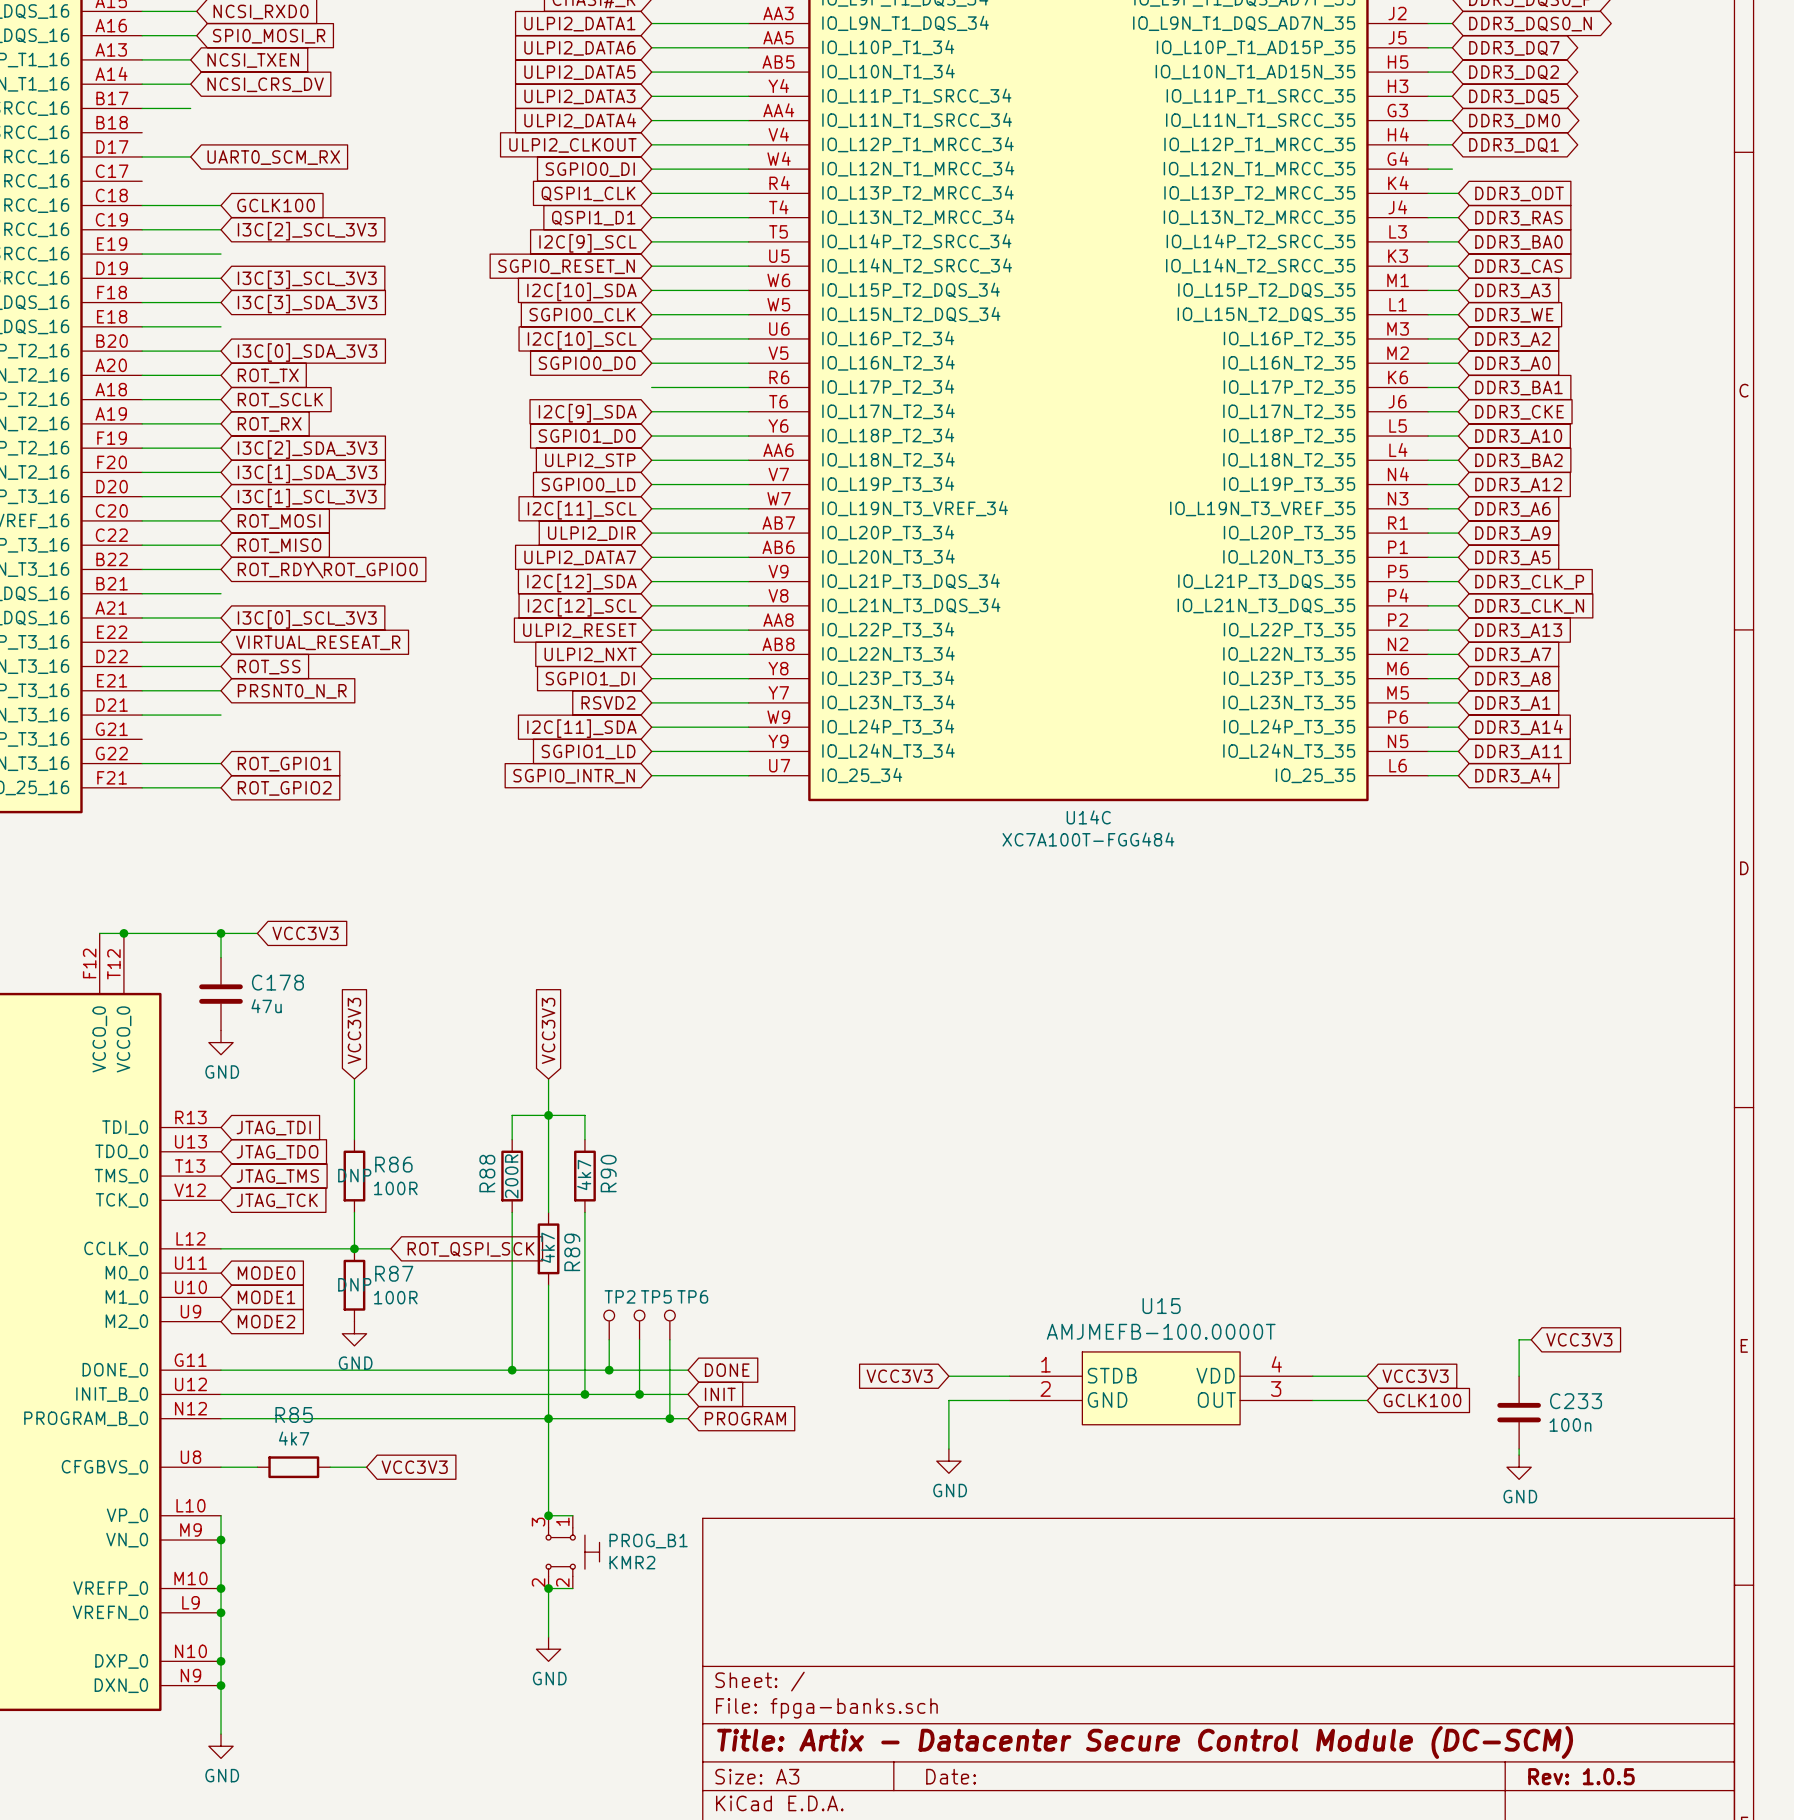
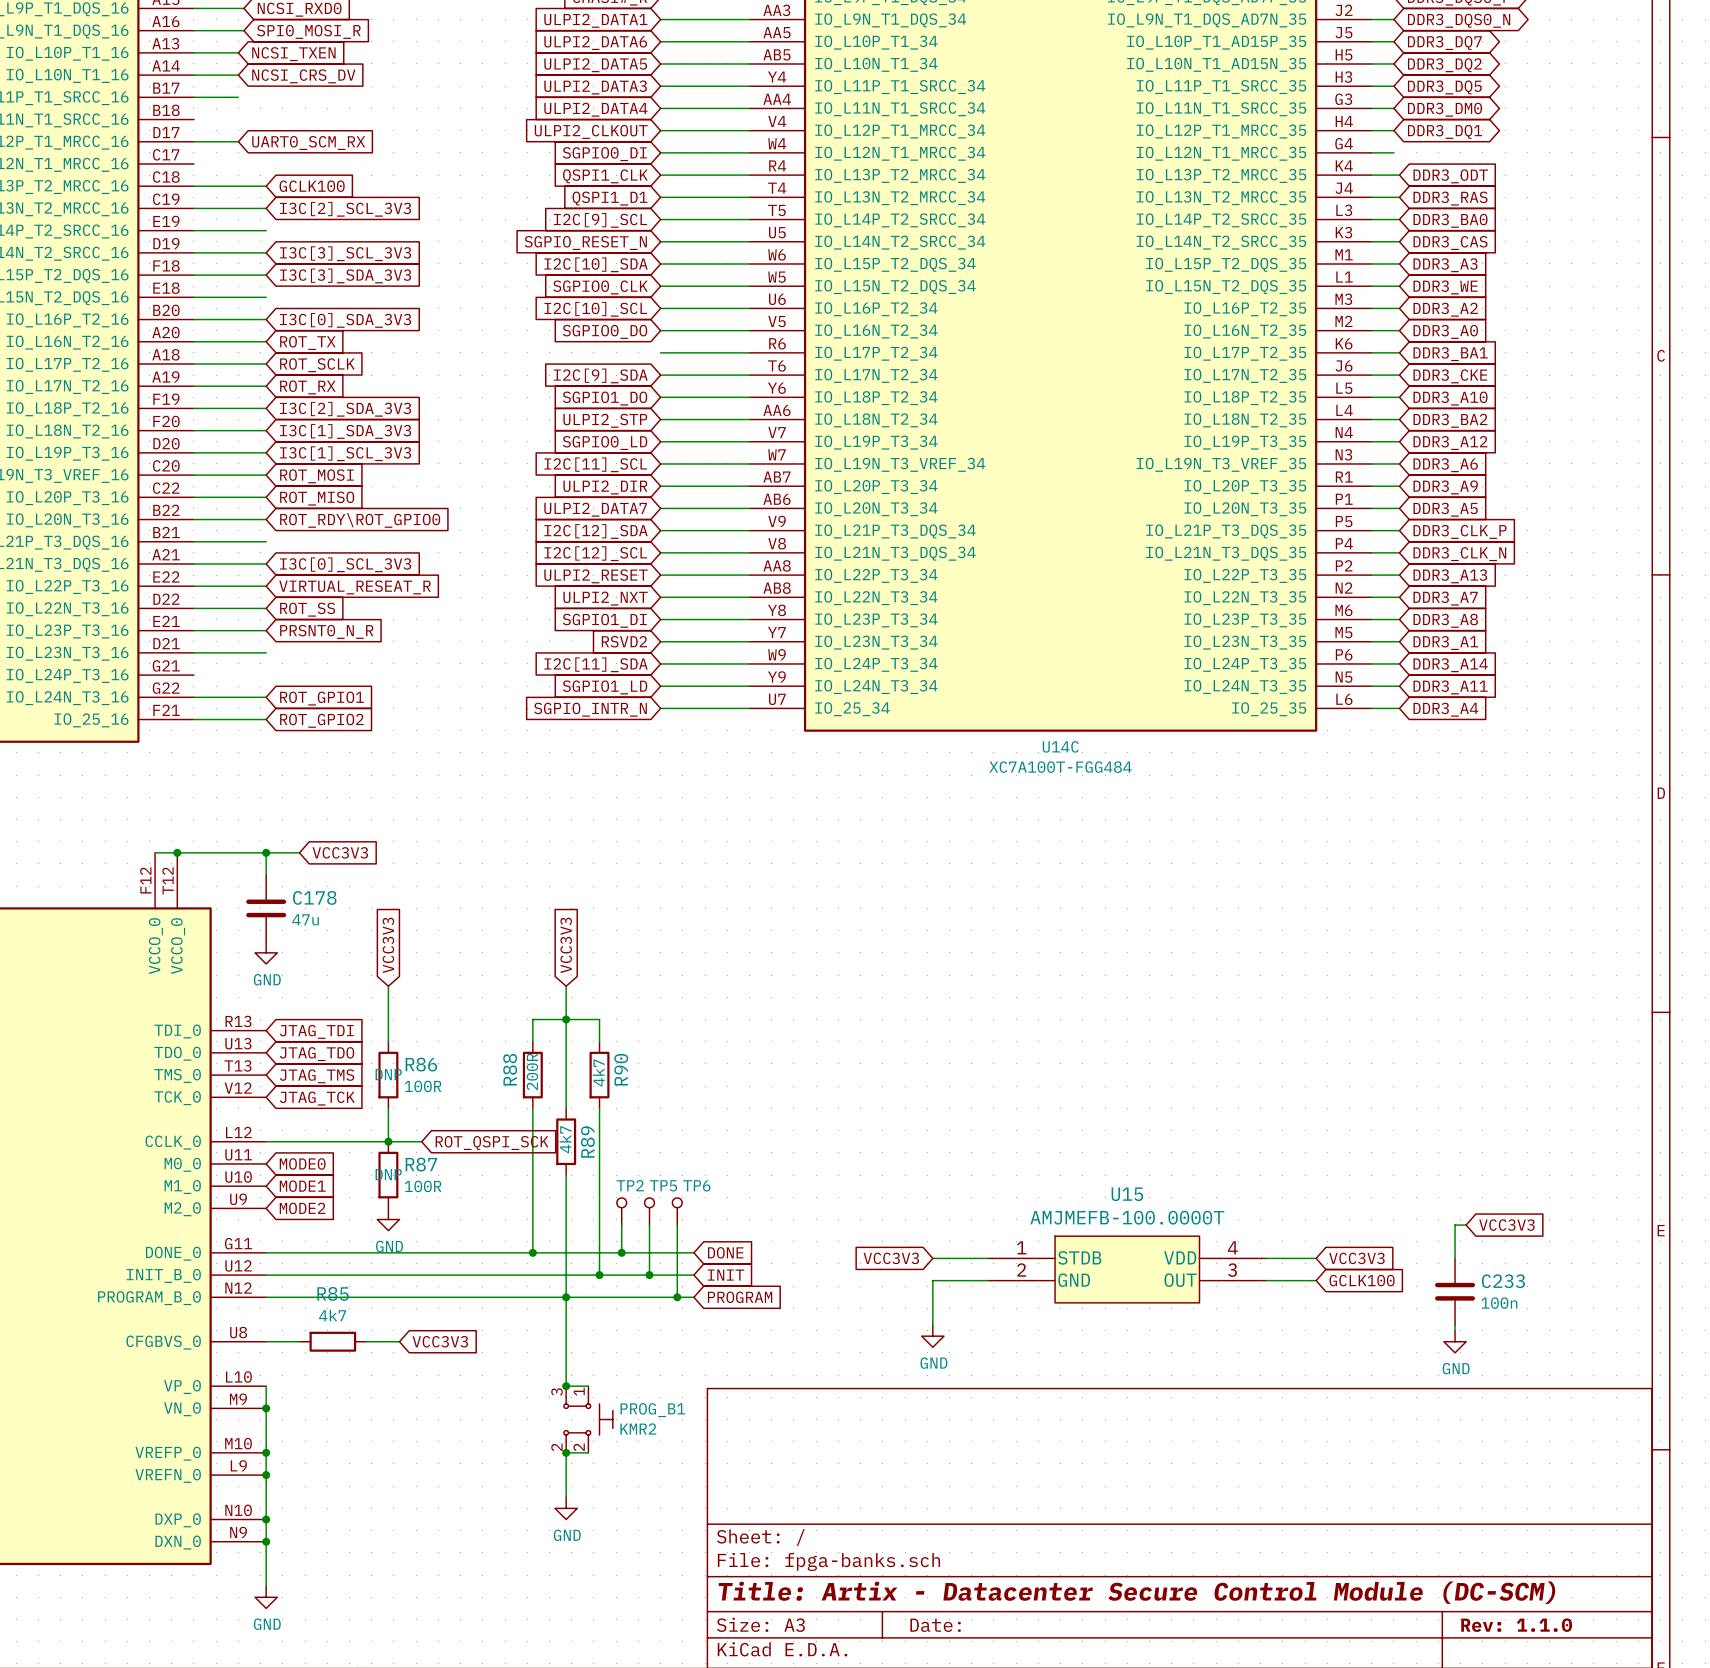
title block: Rev: 1.0.5 (1581, 1776) -> Rev: 1.1.0 (1516, 1625)

